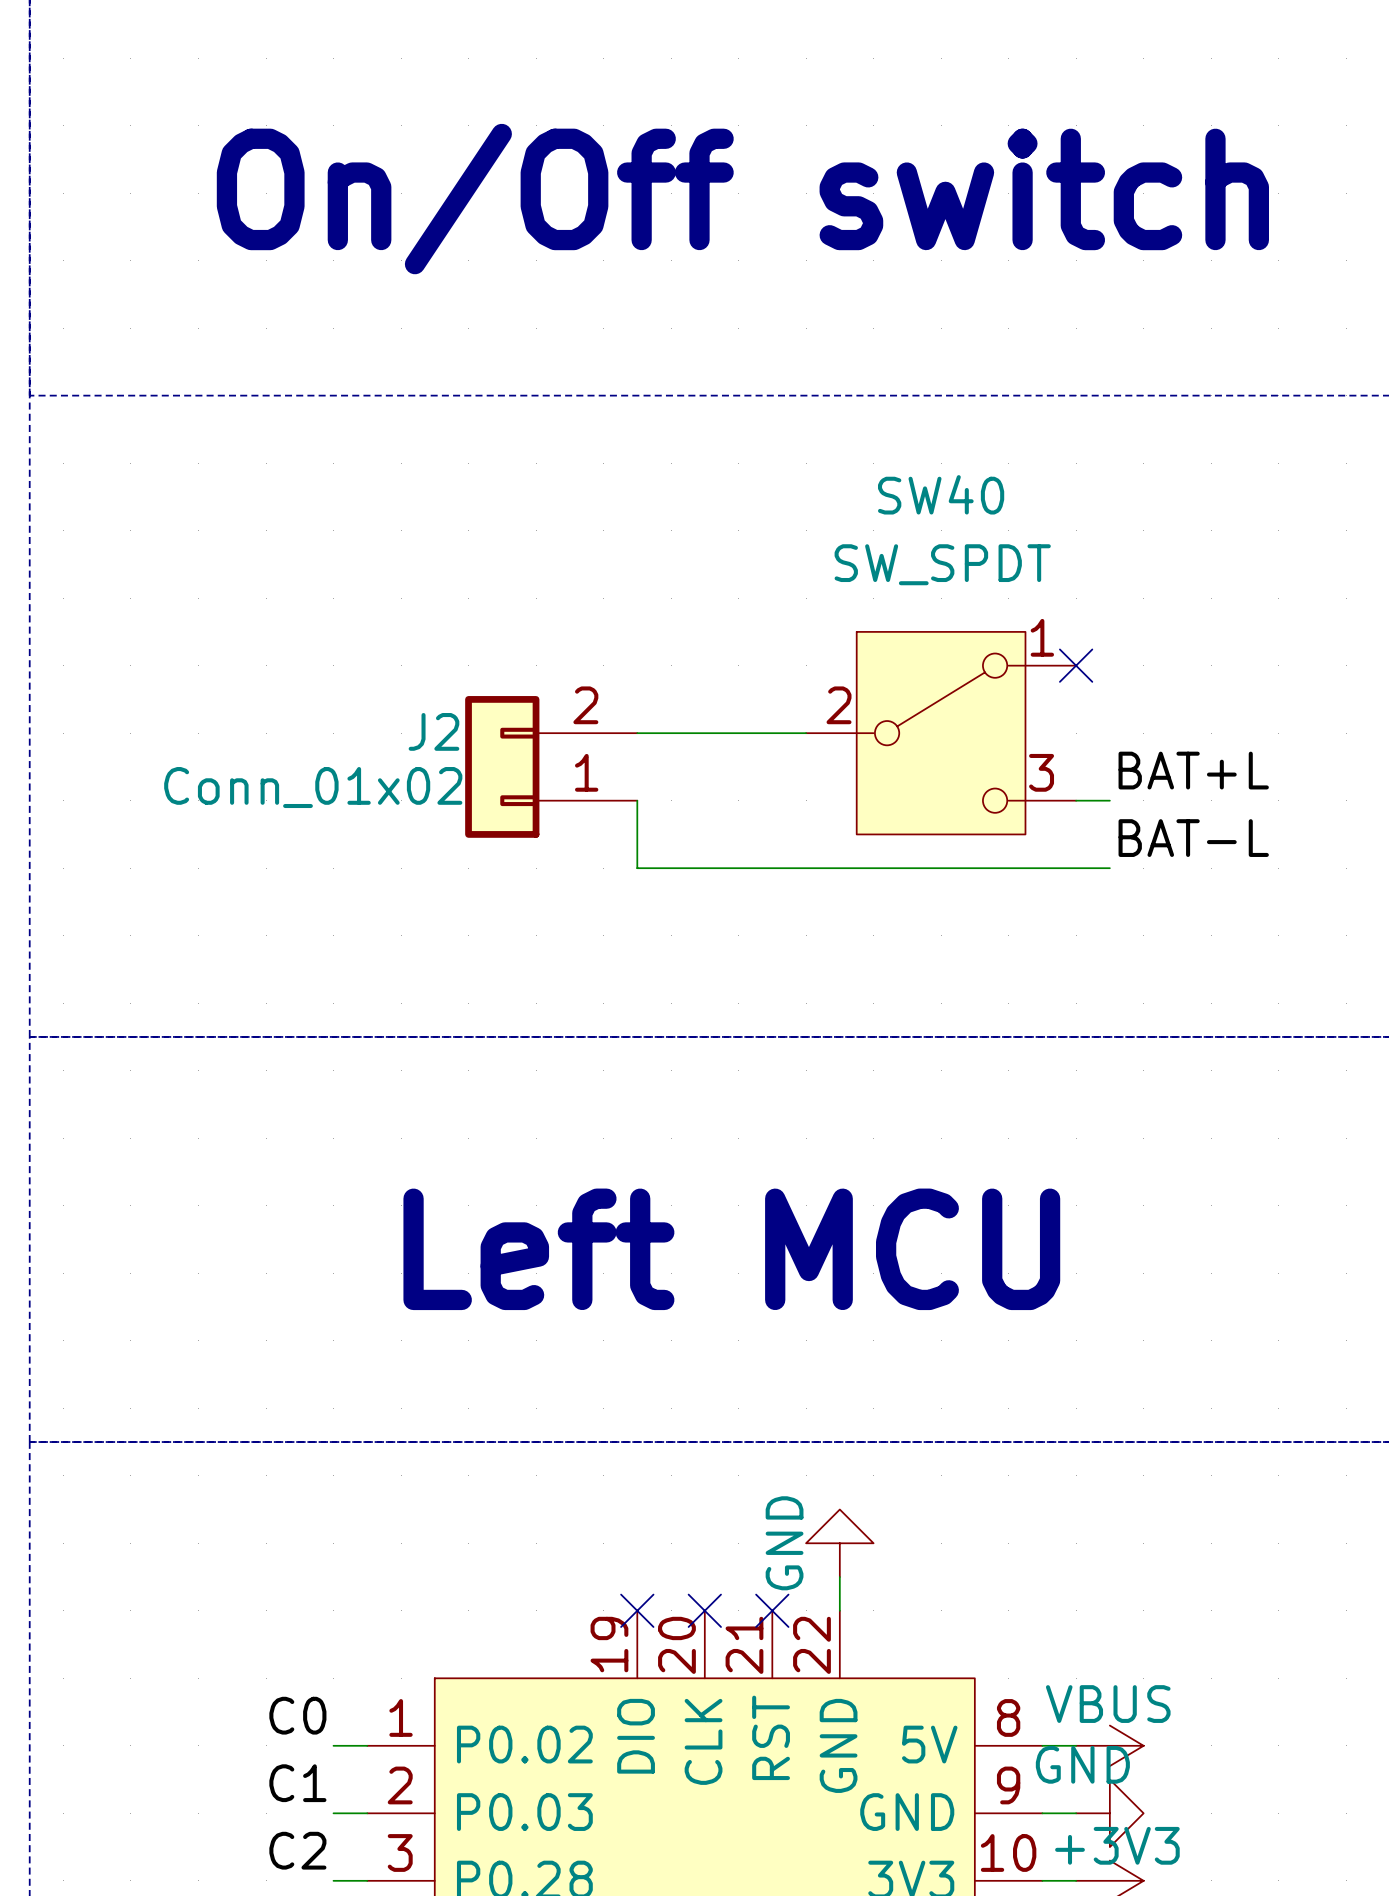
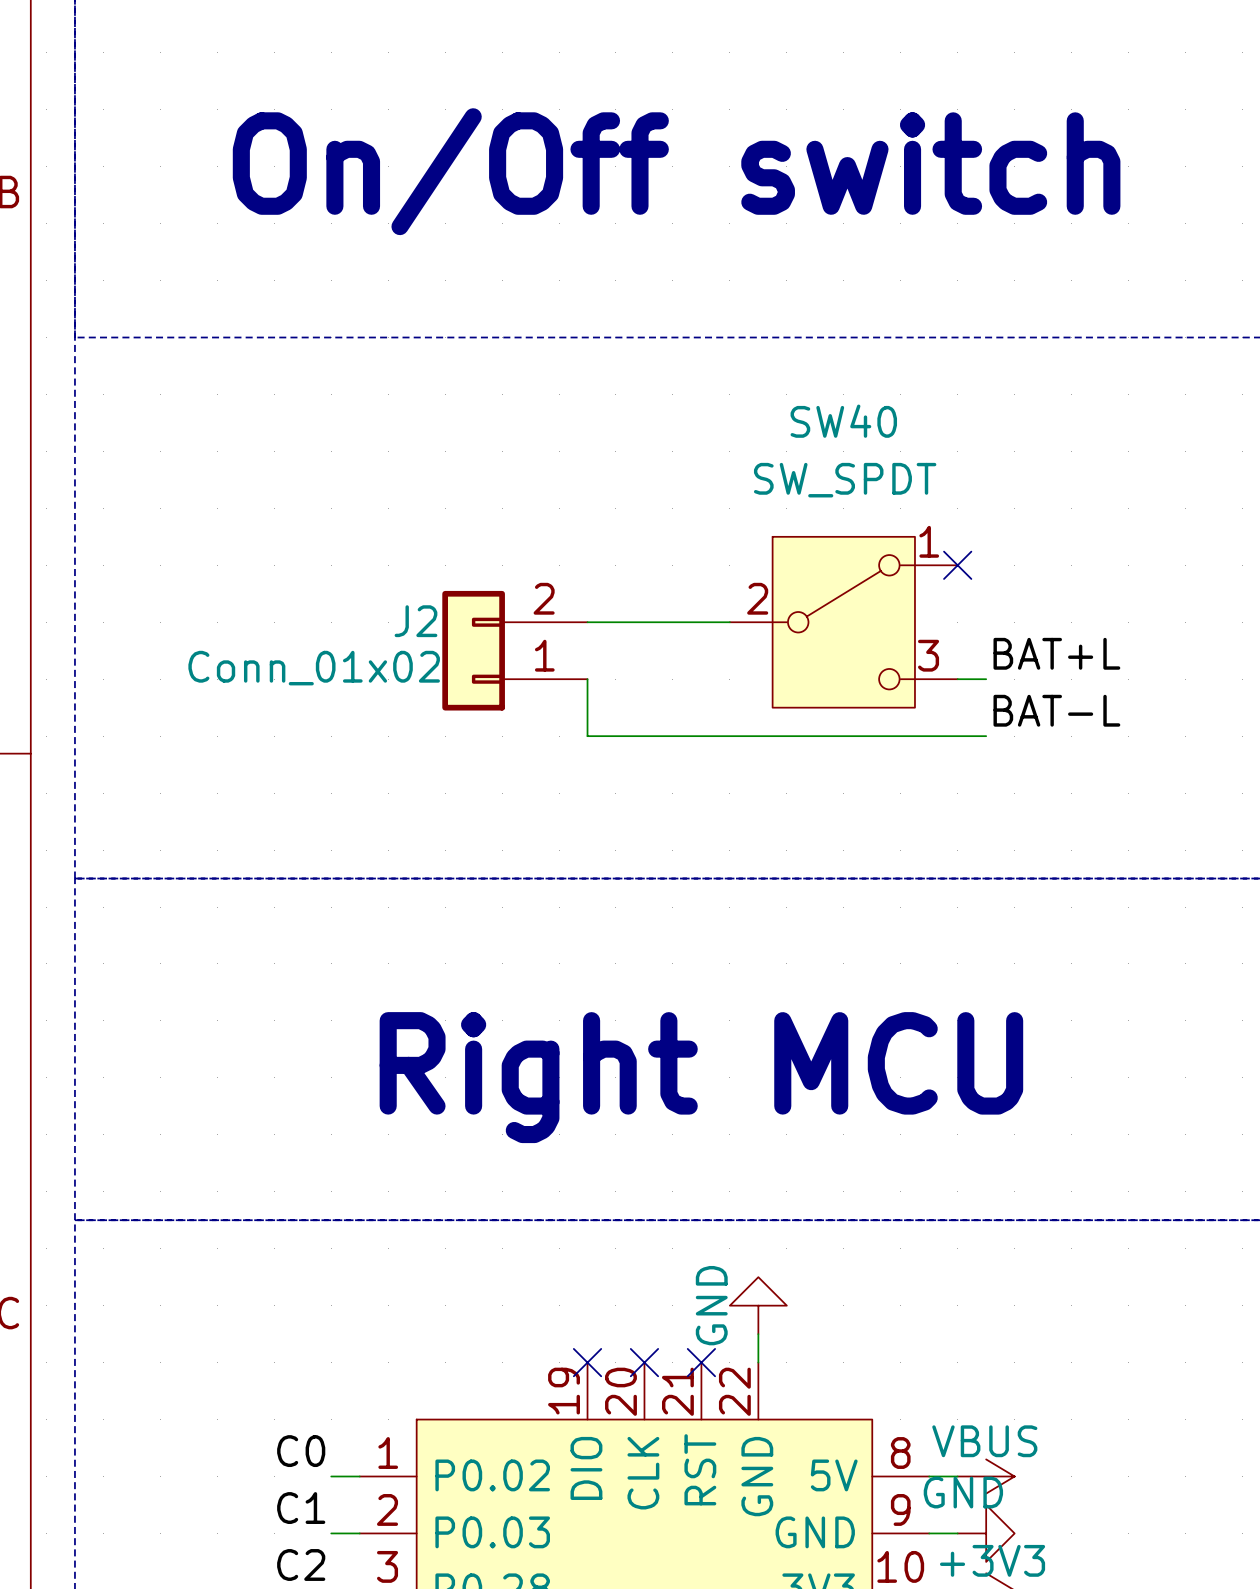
text: Left MCU (731, 1249) -> none
text: none -> Right MCU (701, 1077)

